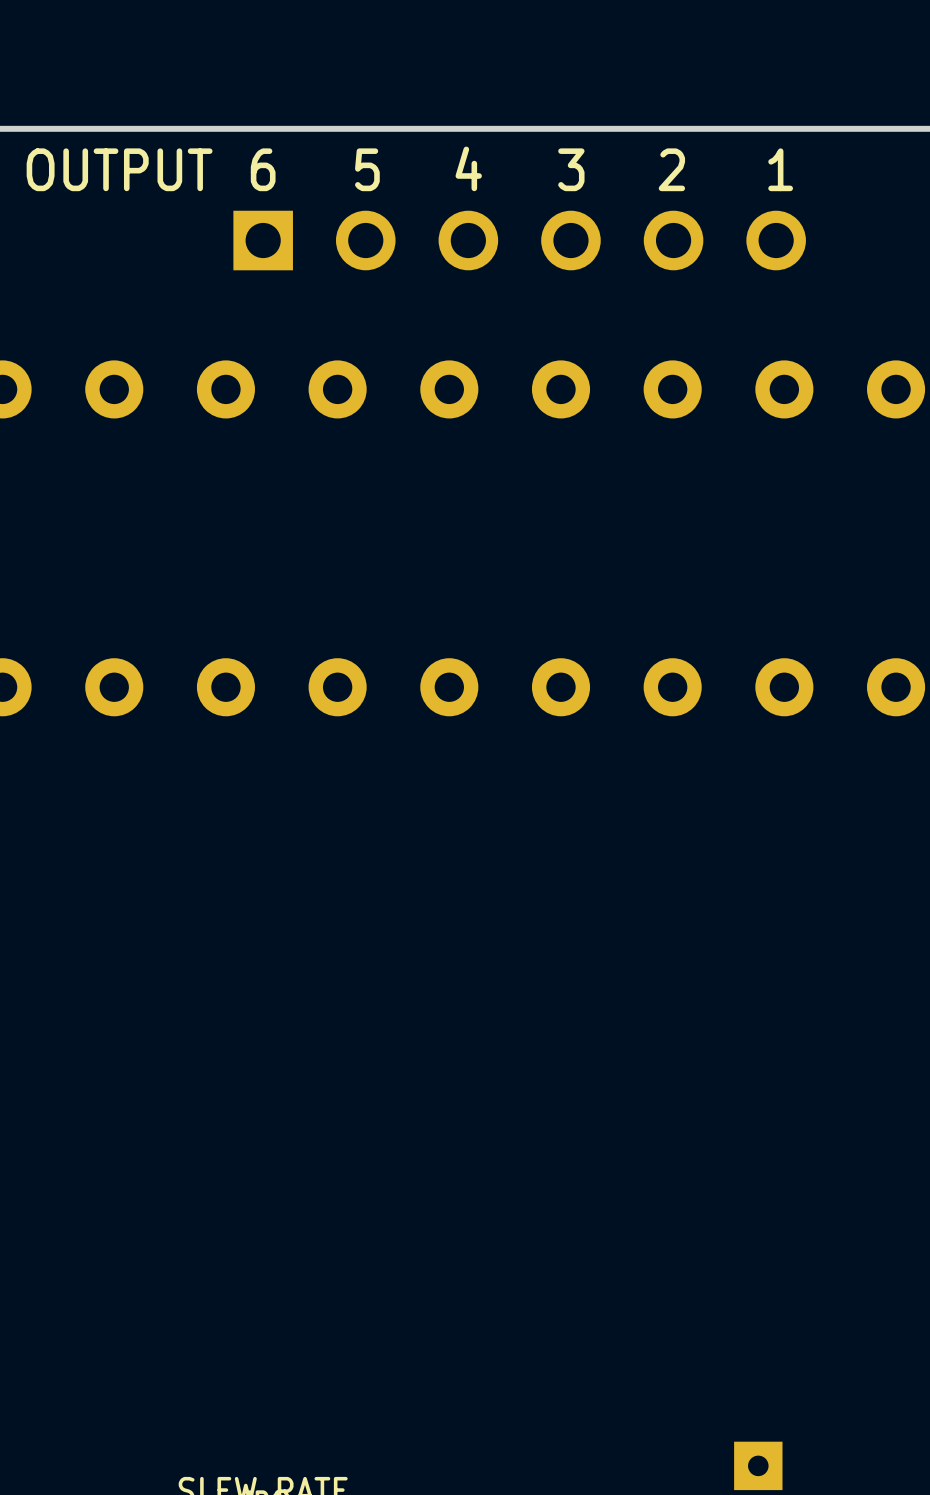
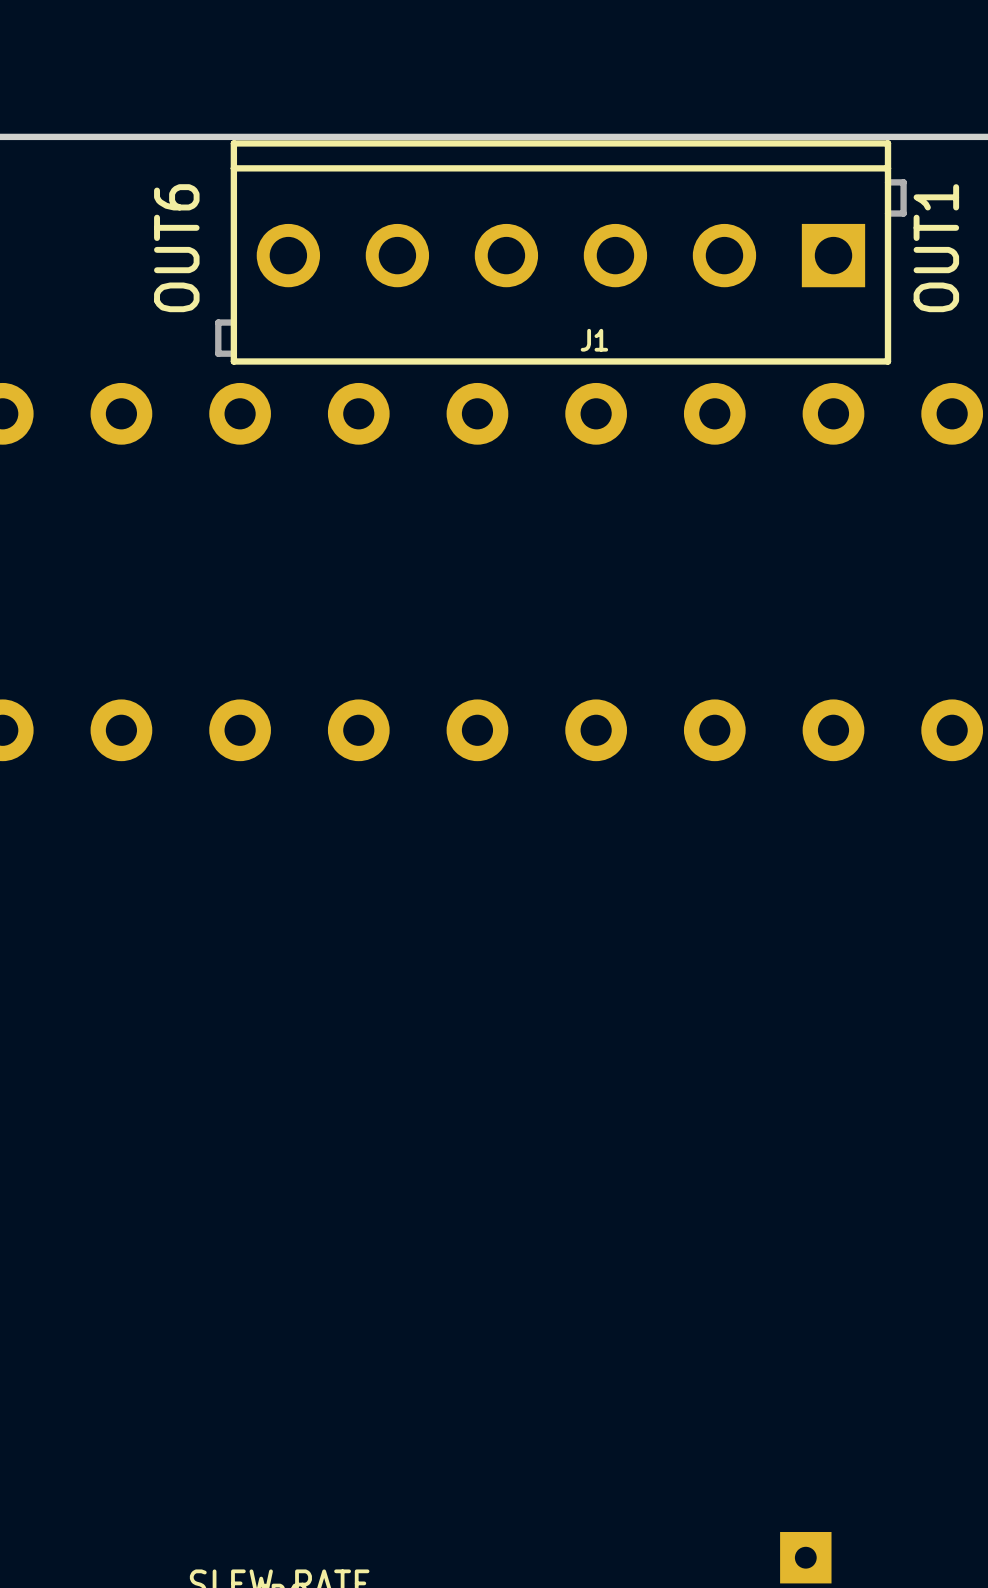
text: 4 (468, 168) -> none
text: OUTPUT (119, 169) -> none
text: 6 (263, 169) -> none
text: 5 (367, 169) -> none
text: 3 (571, 169) -> none
text: 2 (671, 169) -> none
text: 1 (780, 169) -> none
text: none -> OUT6 (176, 248)
text: none -> OUT1 (936, 248)
J1: none -> (560, 252)
part: (519, 240) -> none

